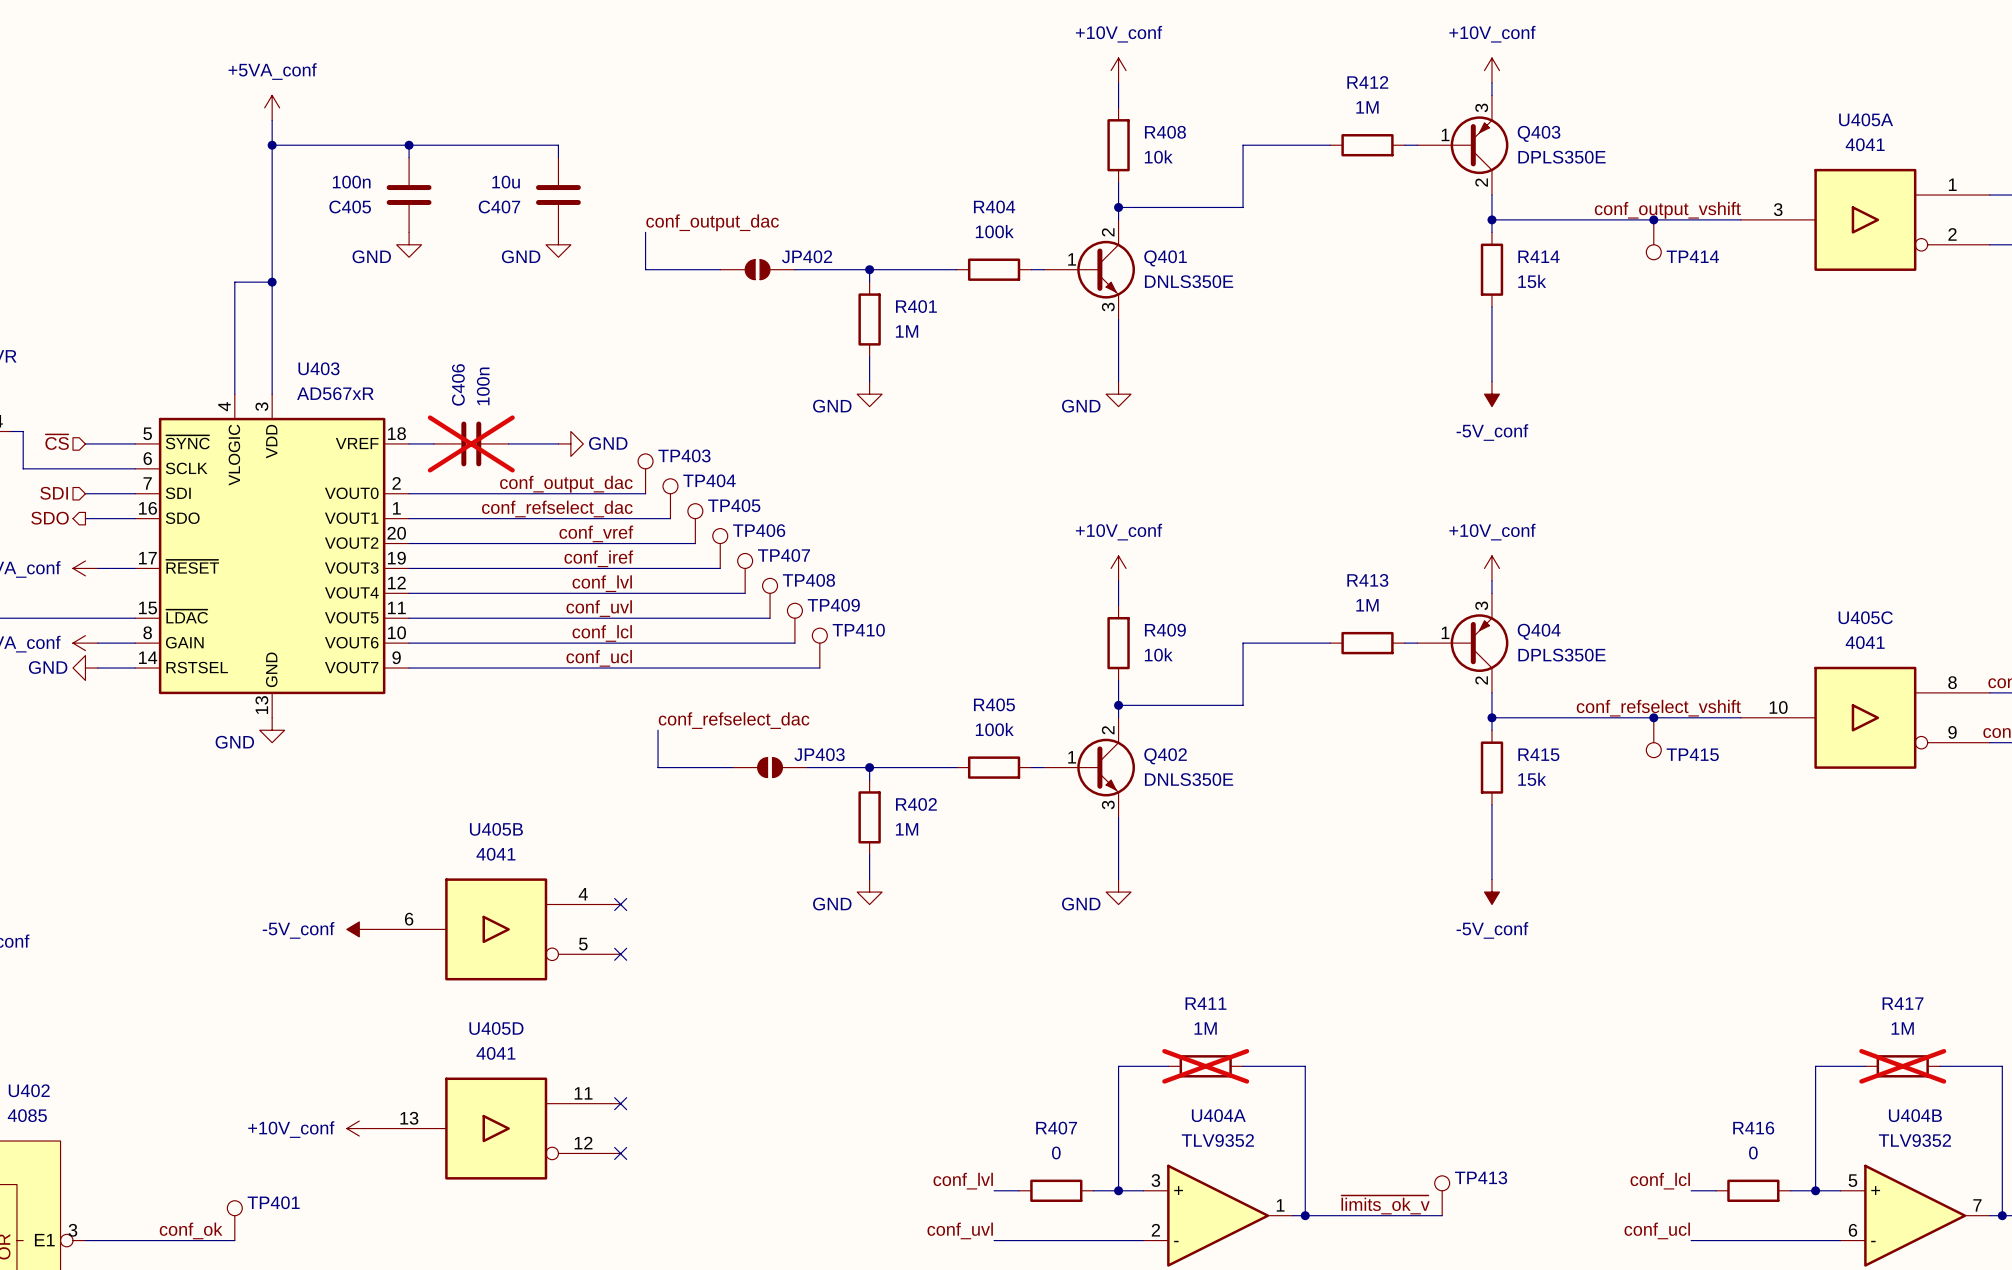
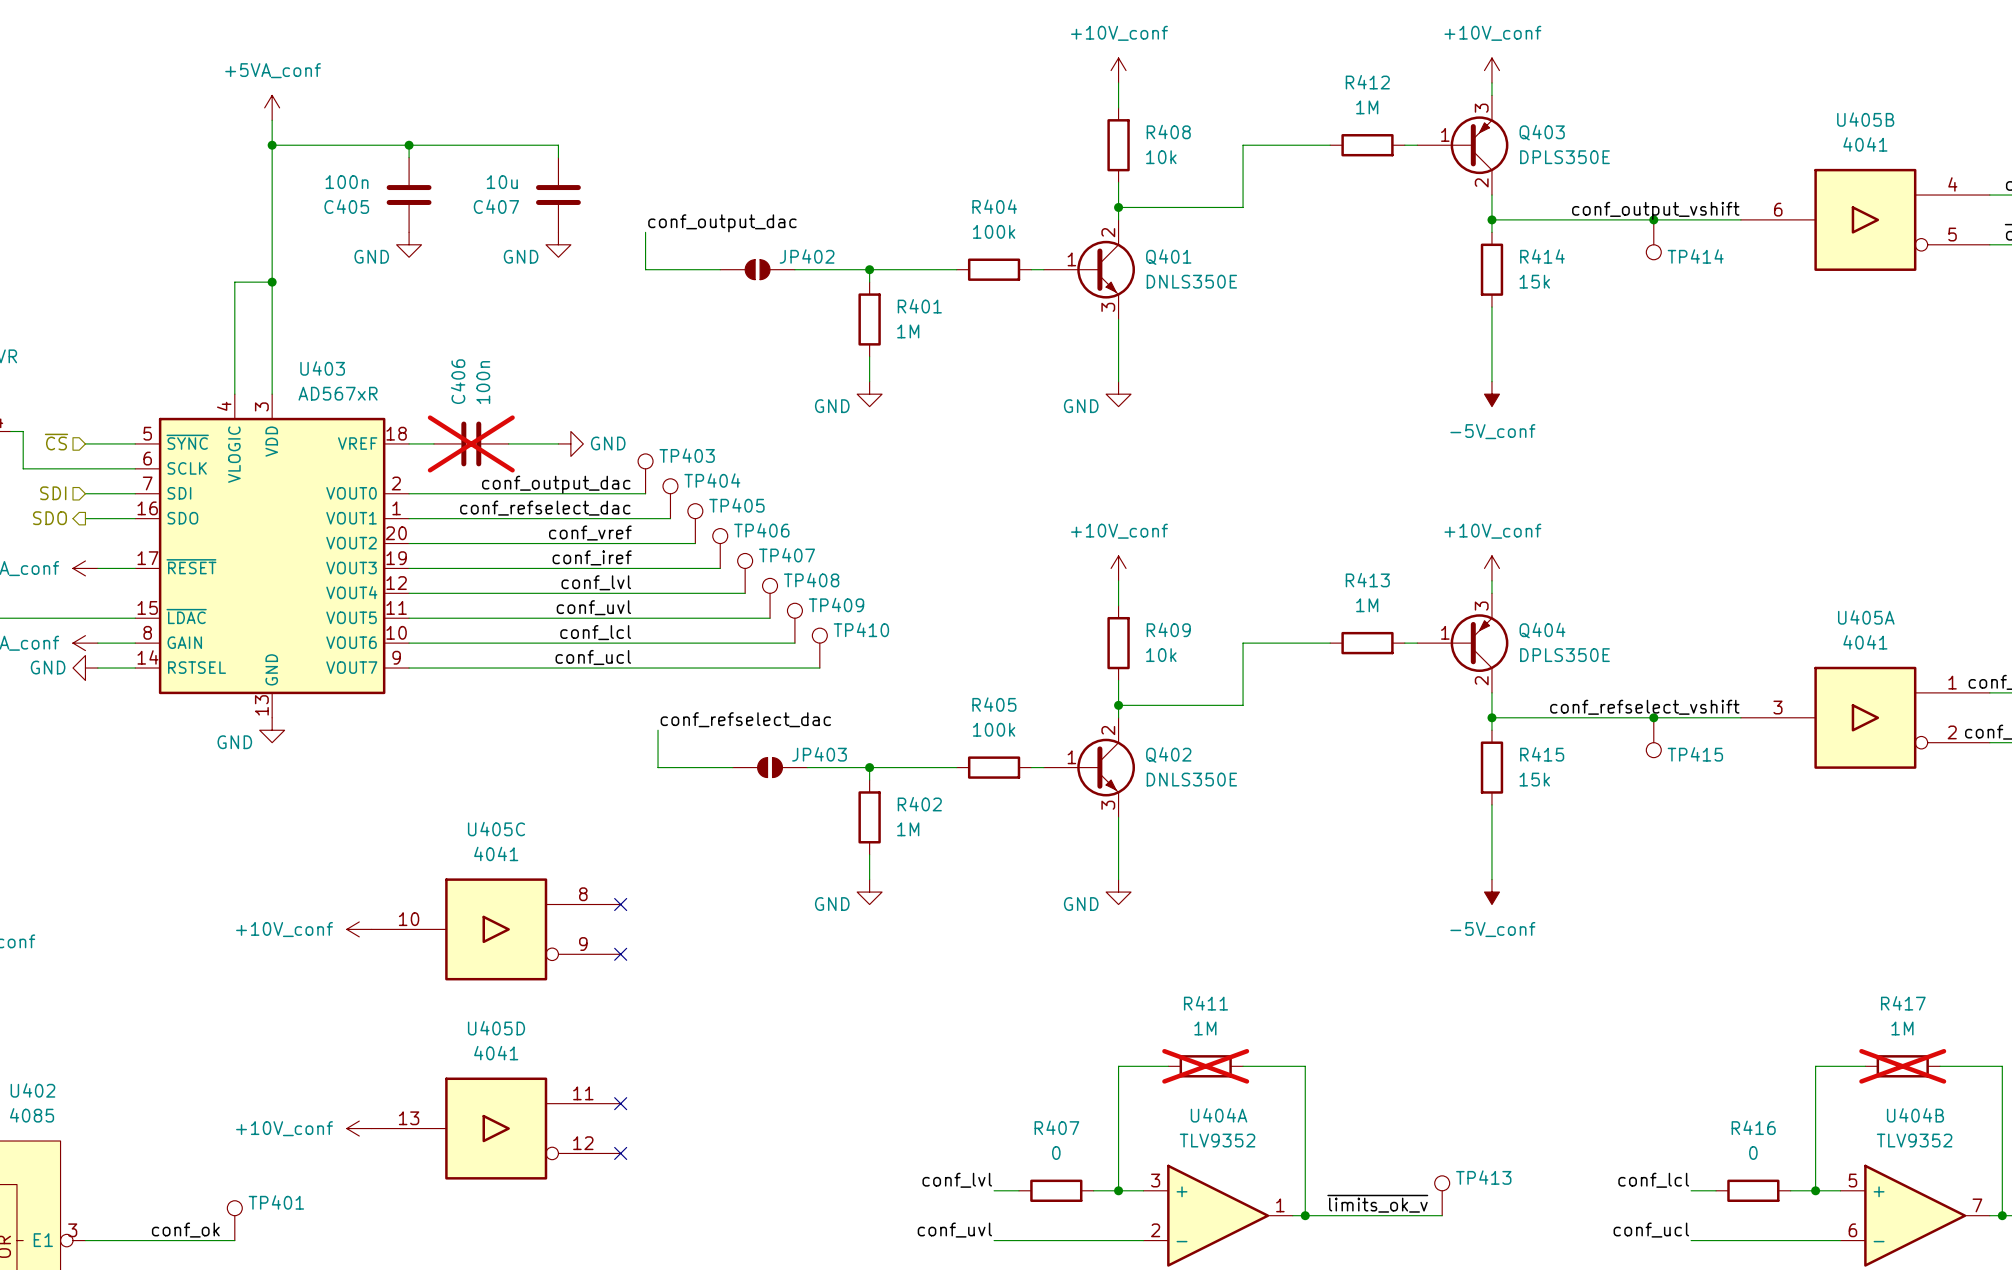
U405A position: (1865, 219) -> (1865, 717)
U405C position: (1865, 717) -> (496, 929)
power symbol: -5V_conf (359, 929) -> +10V_conf (359, 929)
U405B position: (496, 929) -> (1865, 219)

